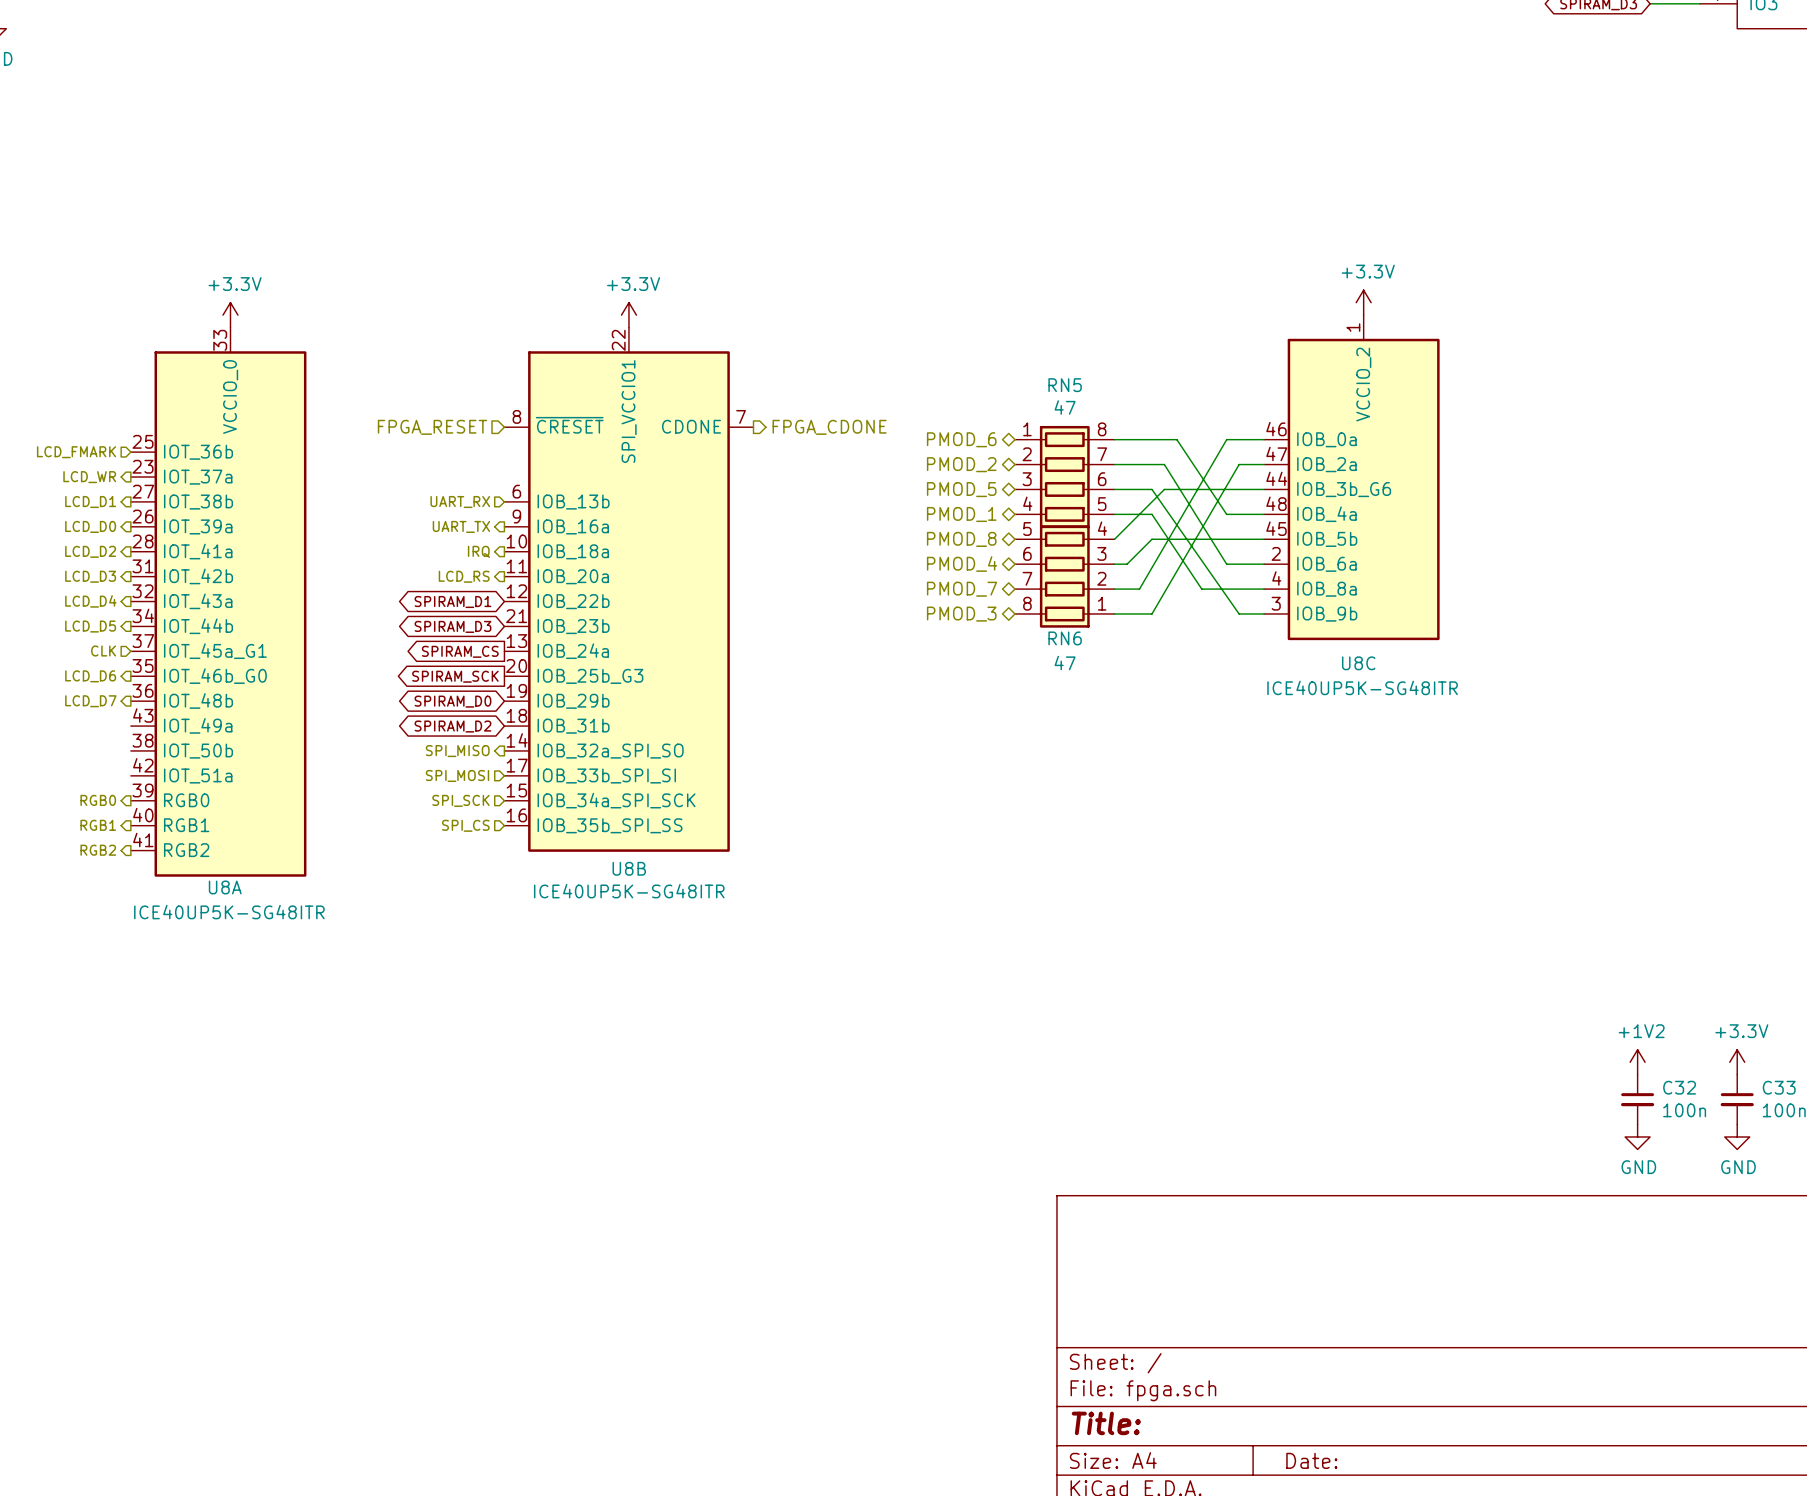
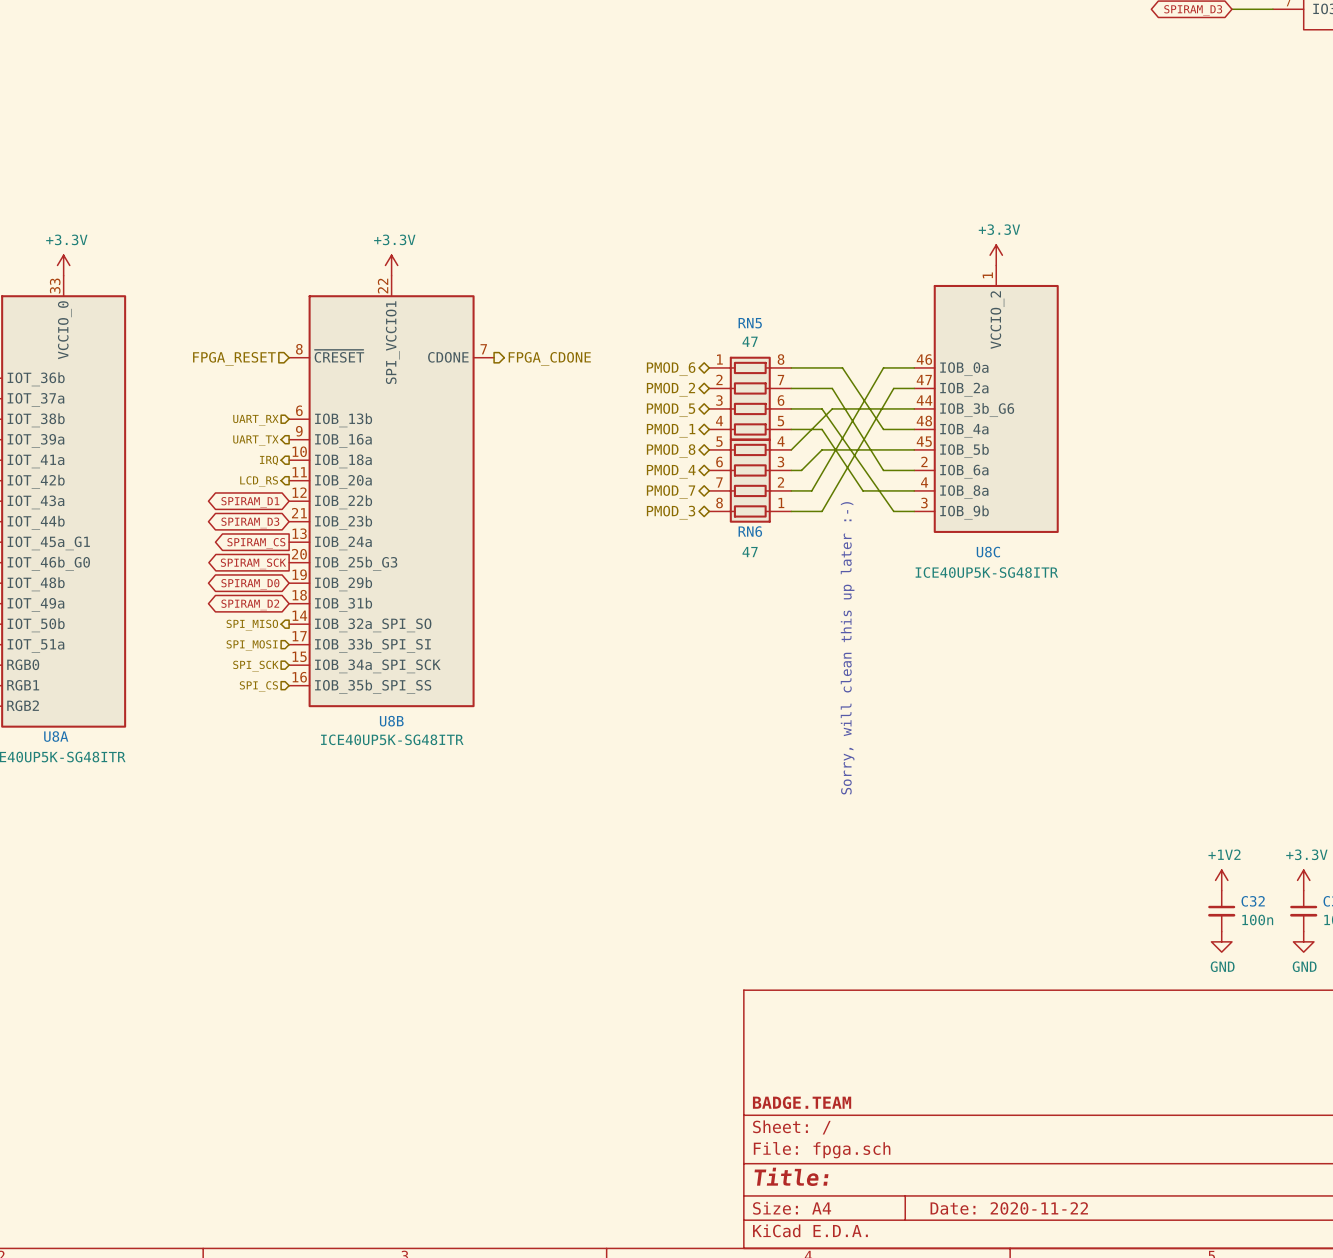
text: none -> Sorry, will clean this up later :-) (847, 648)
title block: none -> BADGE.TEAM (802, 1102)
title block: Date: (1311, 1460) -> Date: 2020-11-22 (1009, 1208)

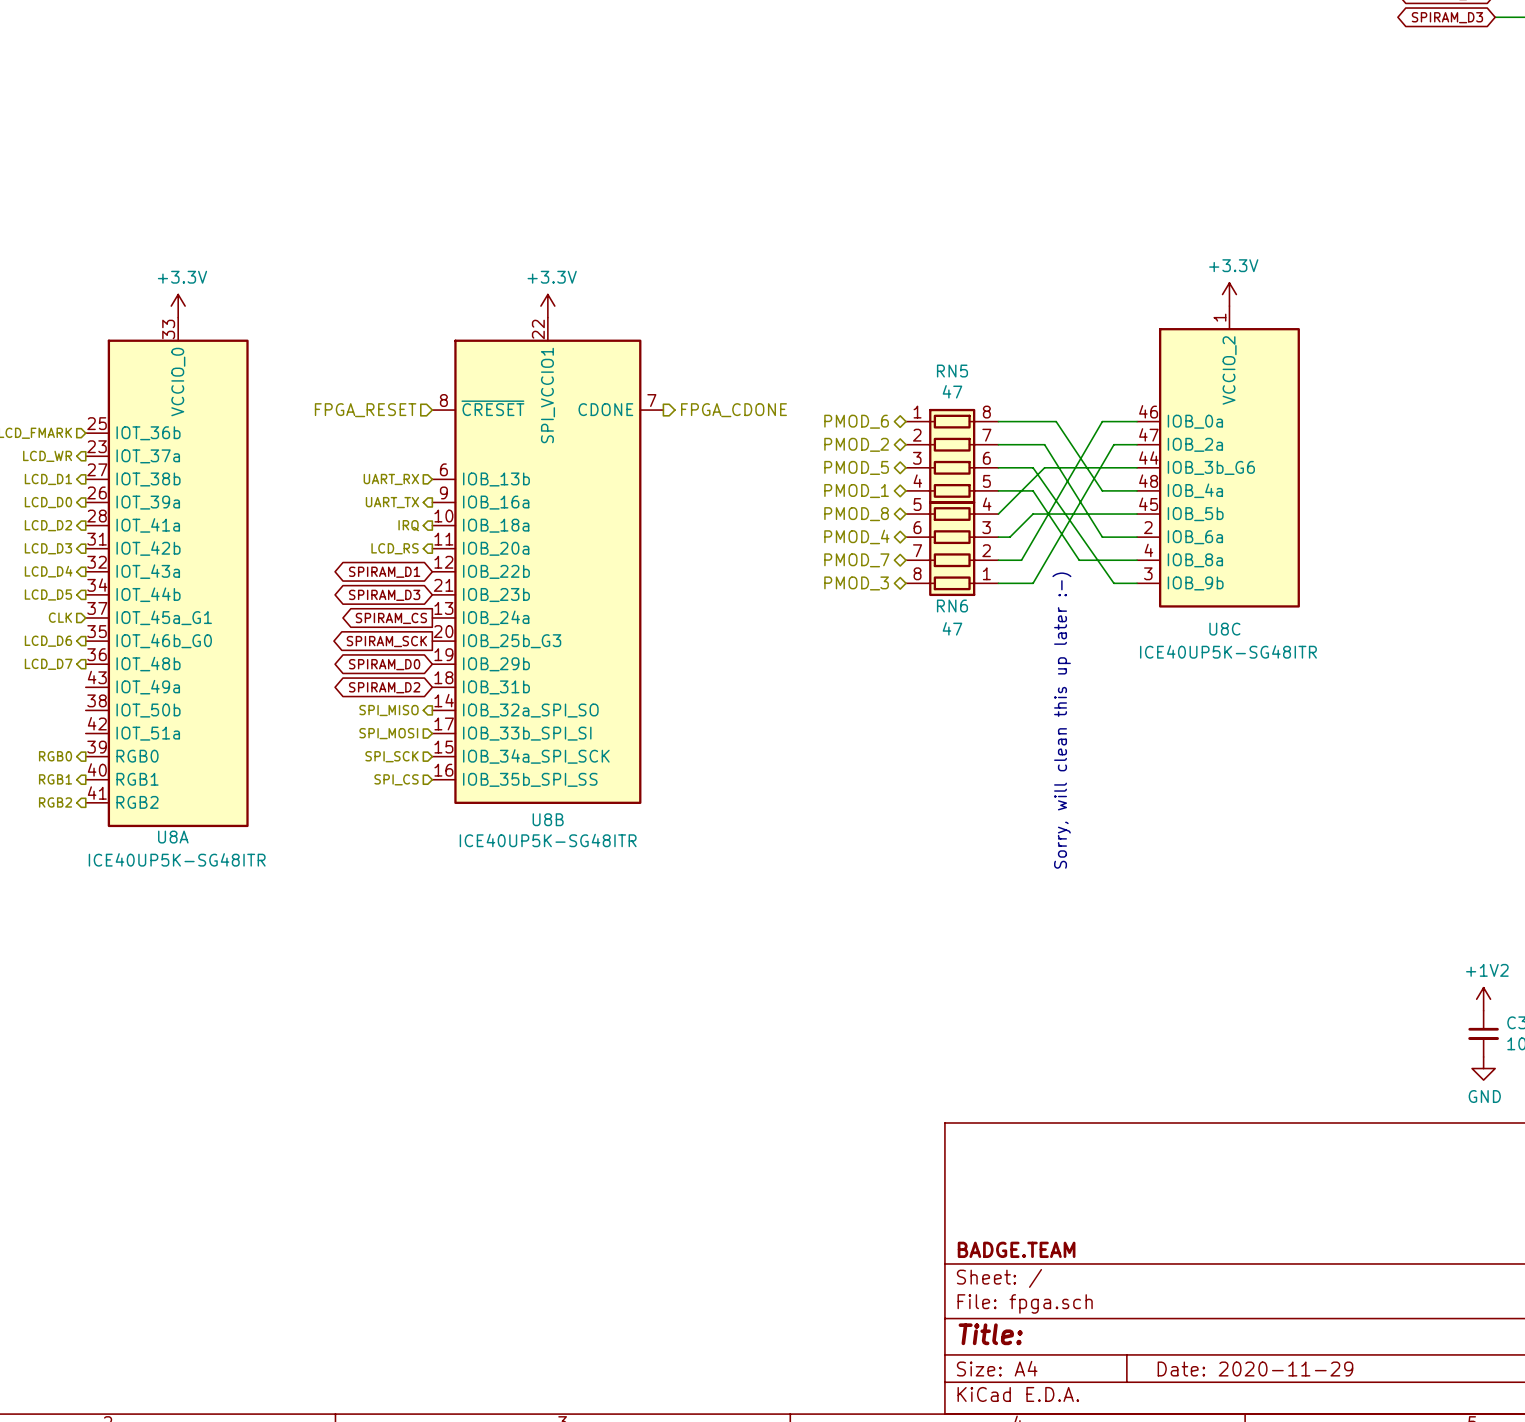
title block: Date: 2020-11-22 (1009, 1208) -> Date: 2020-11-29 (1255, 1369)

